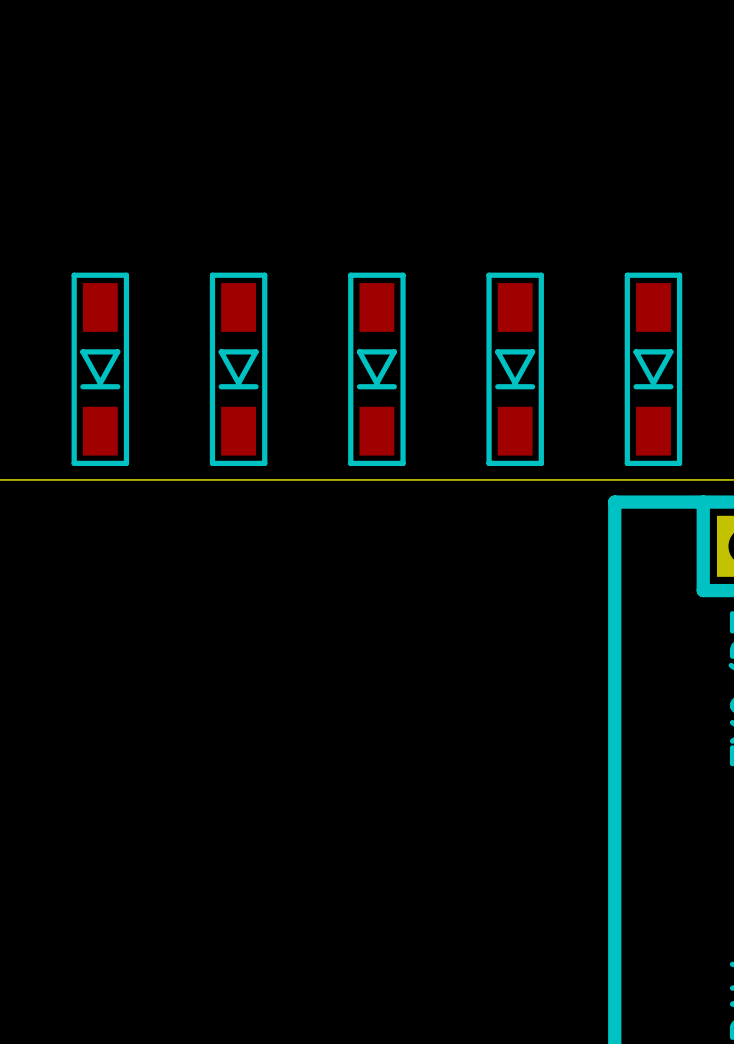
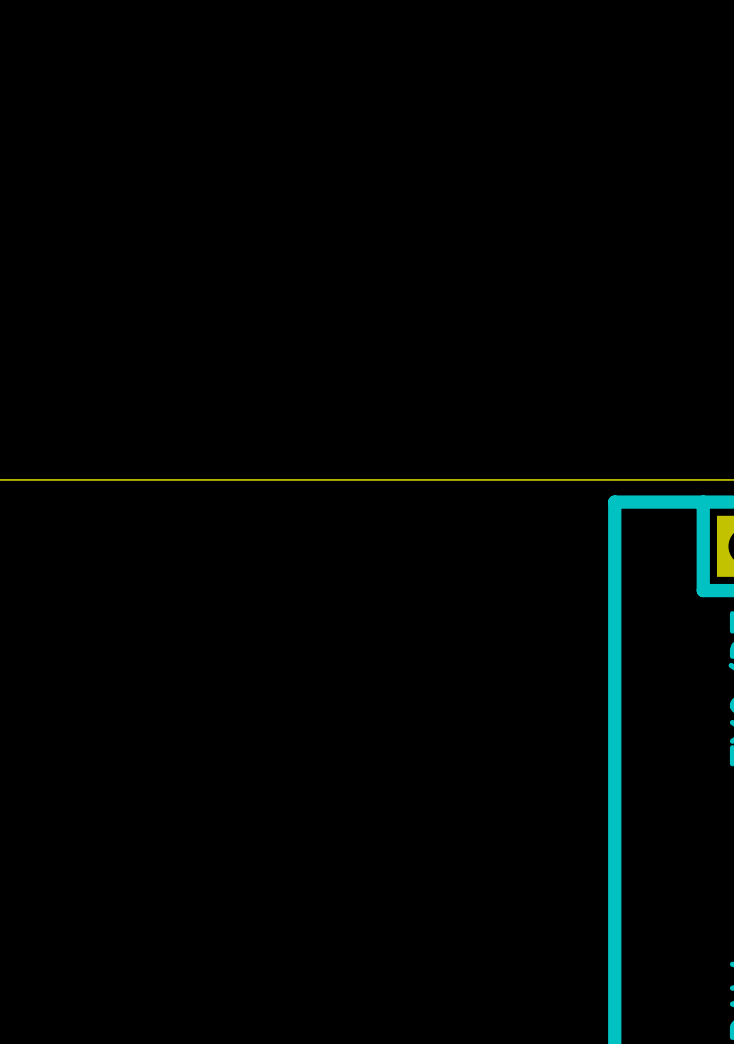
part: (100, 369) -> none
part: (238, 369) -> none
part: (376, 369) -> none
part: (515, 369) -> none
part: (653, 369) -> none

